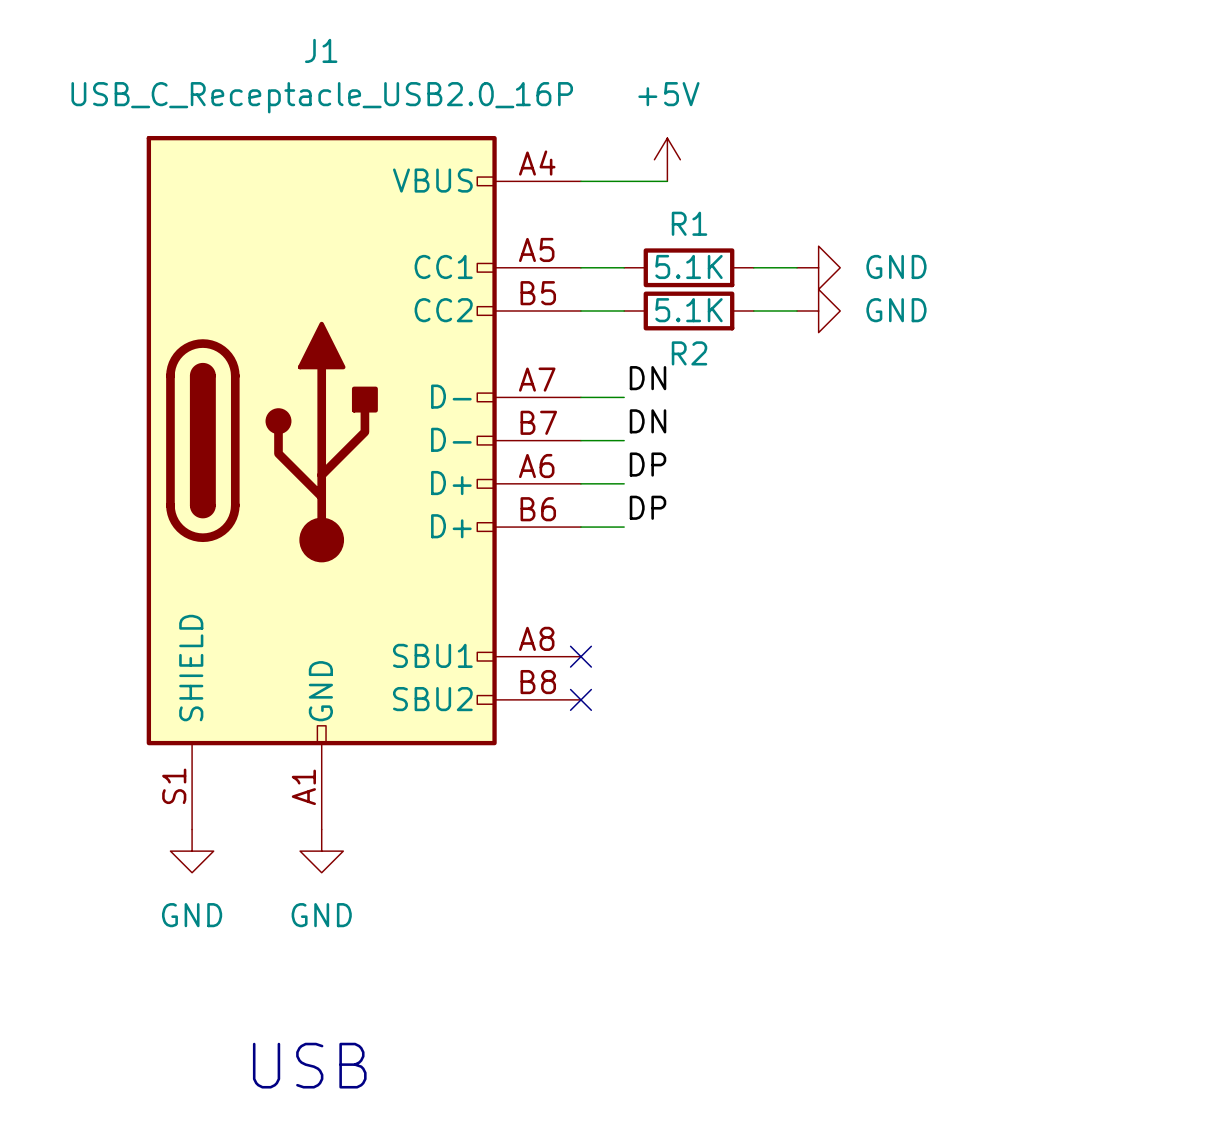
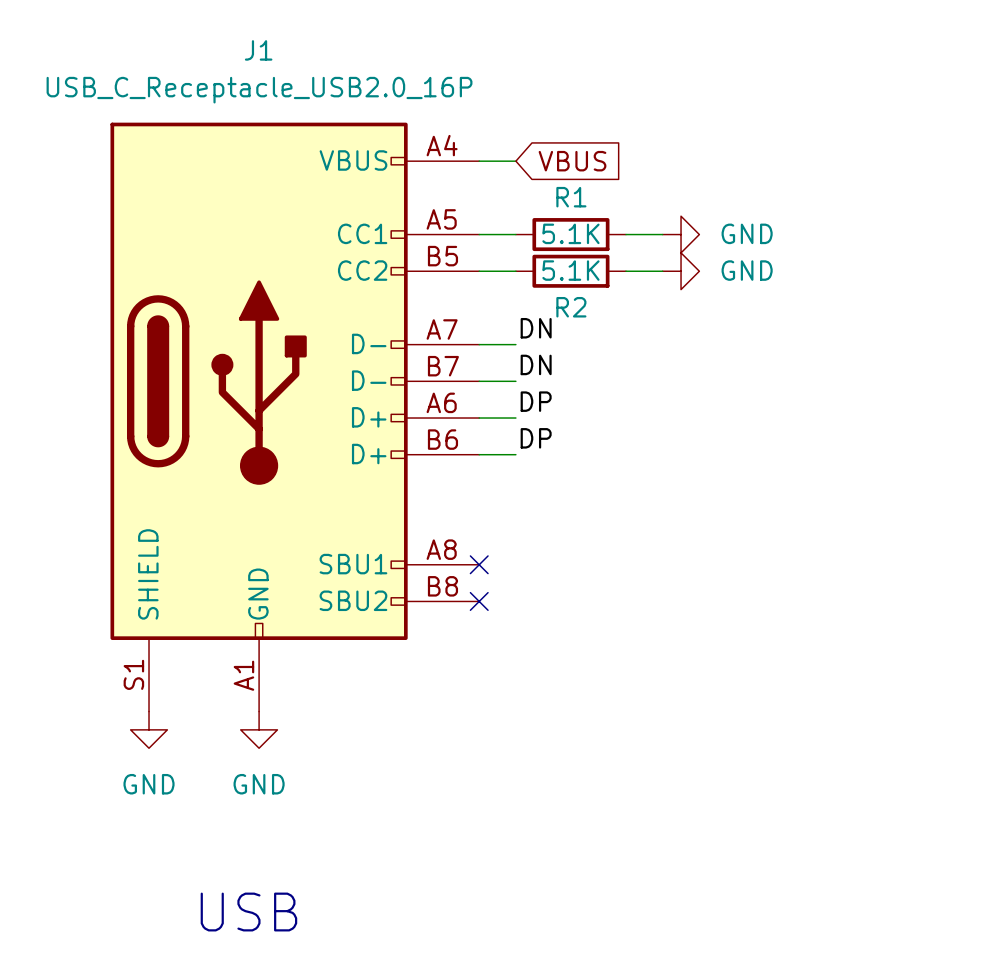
power symbol: +5V (667, 159) -> none
wire: (624, 181) (667, 181) -> none
global label: none -> VBUS (572, 161)

